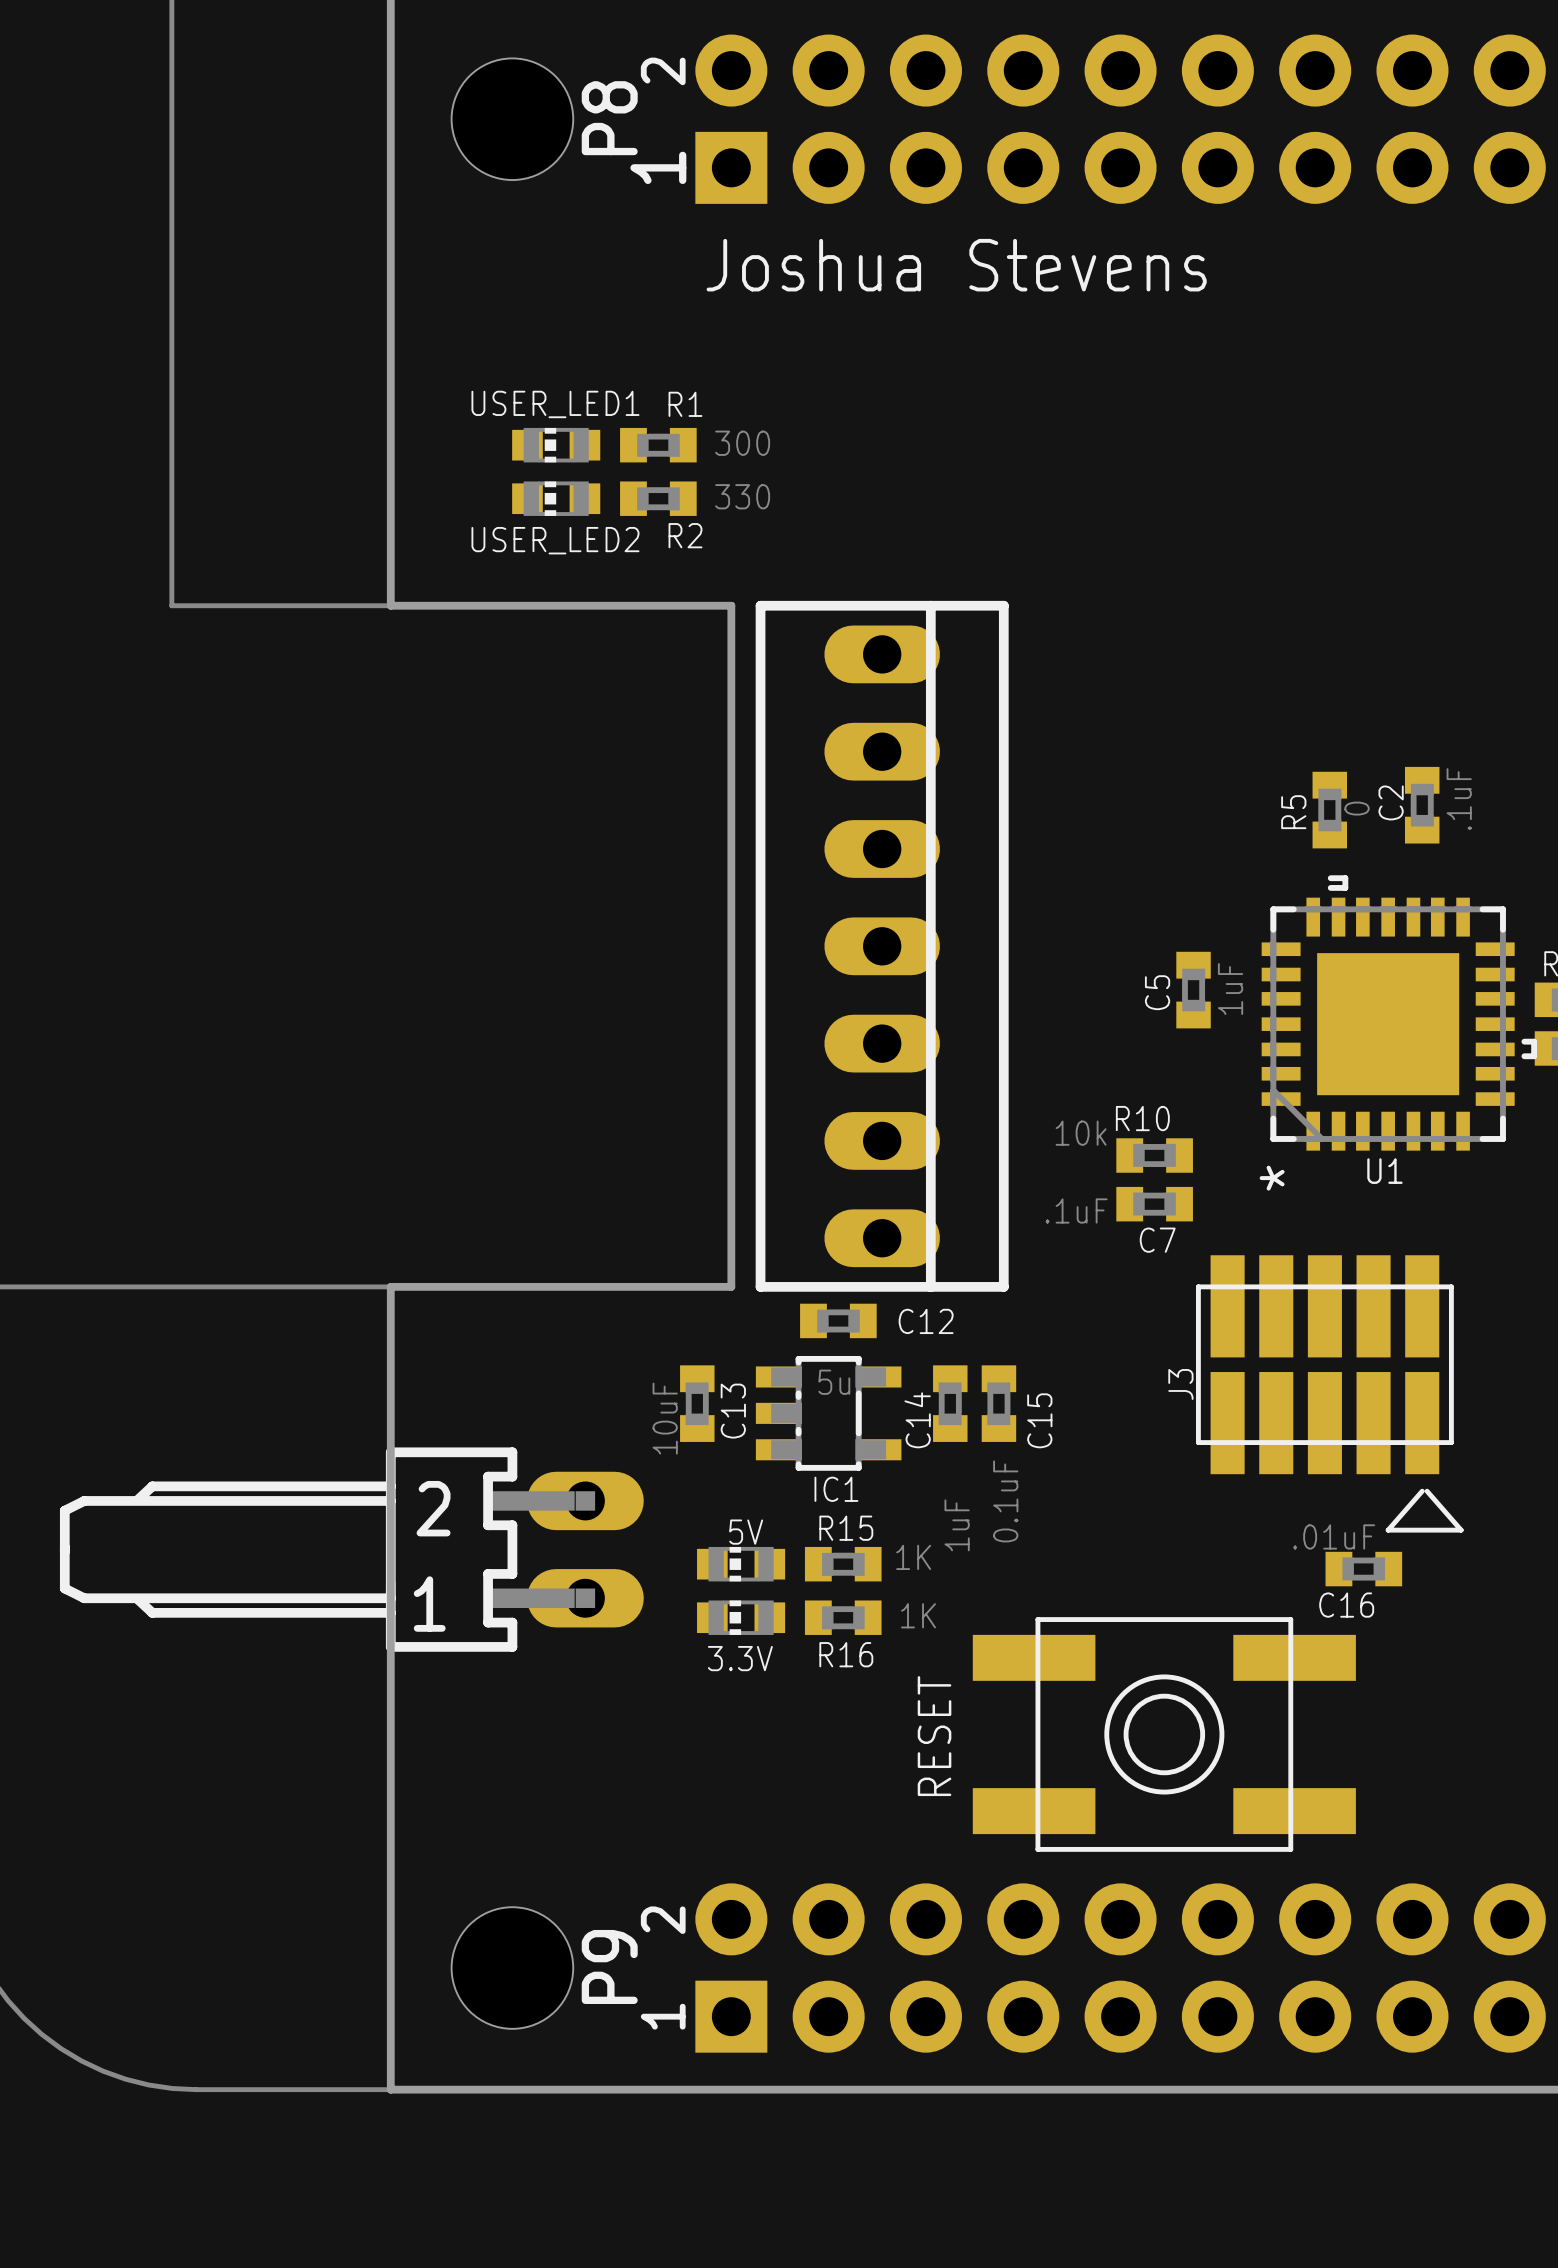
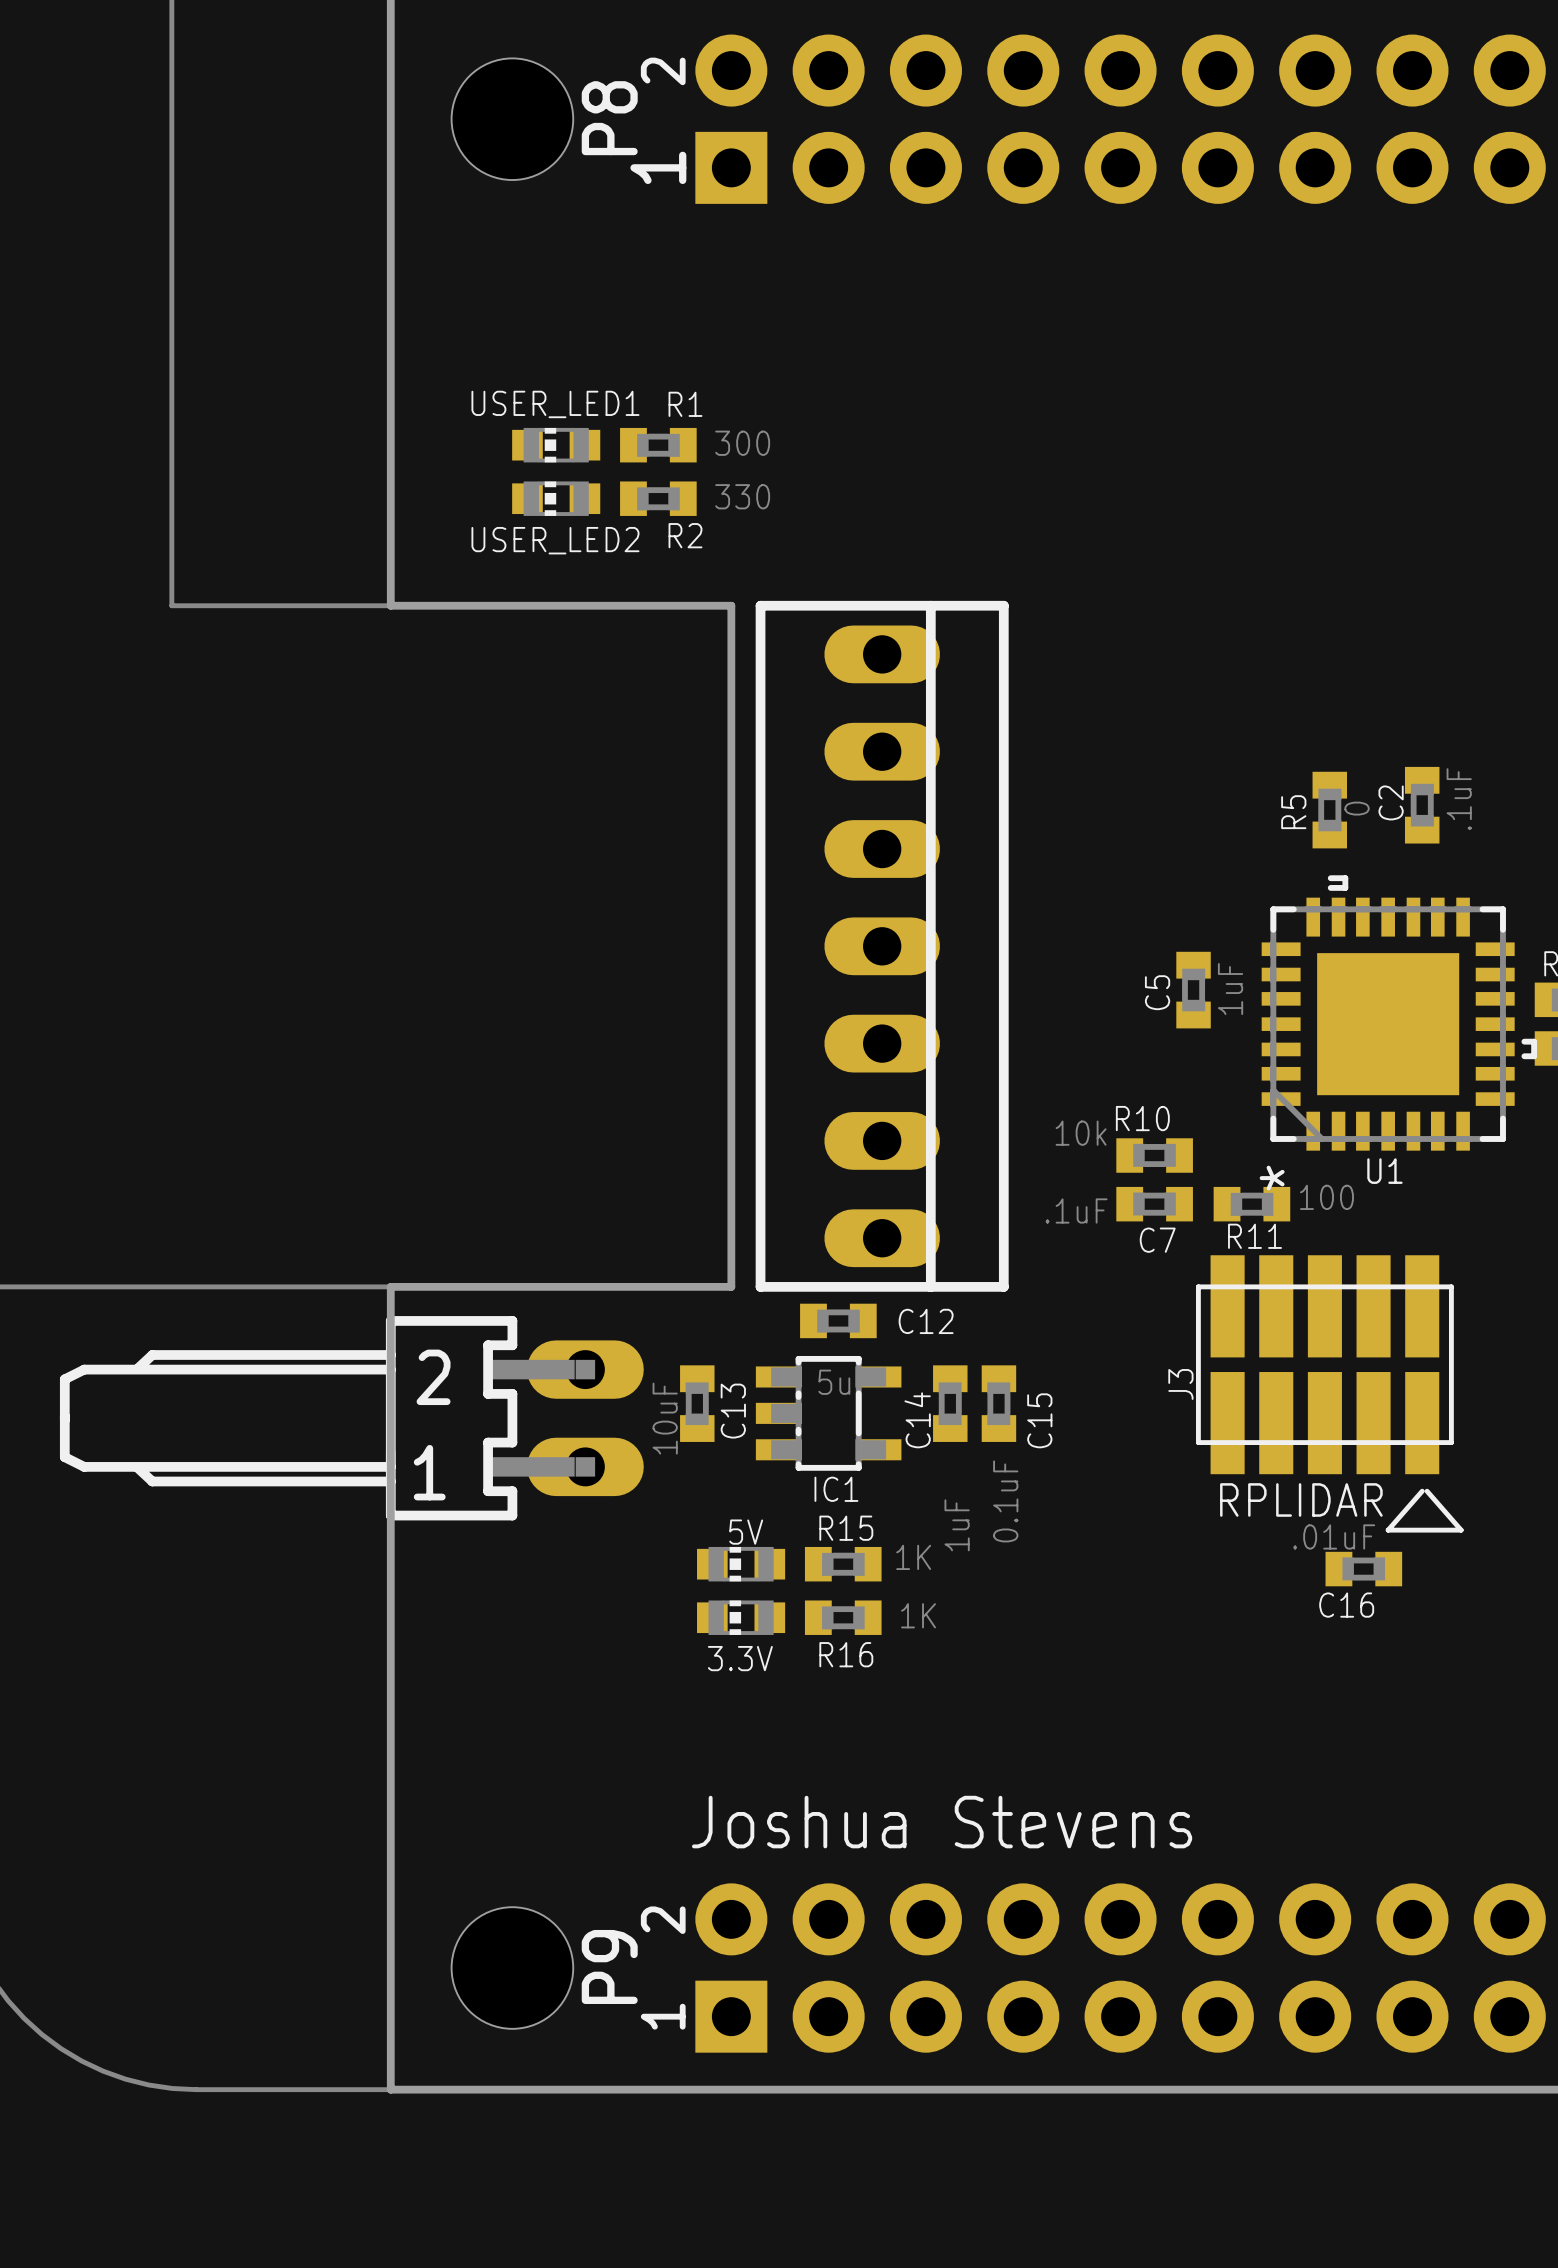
text: Joshua Stevens (956, 265) -> none
R11: none -> 100 (1251, 1204)
text: none -> RPLIDAR (1301, 1499)
part position: (351, 1549) -> (351, 1418)
RESET: (1164, 1734) -> none
text: none -> Joshua Stevens (942, 1822)

